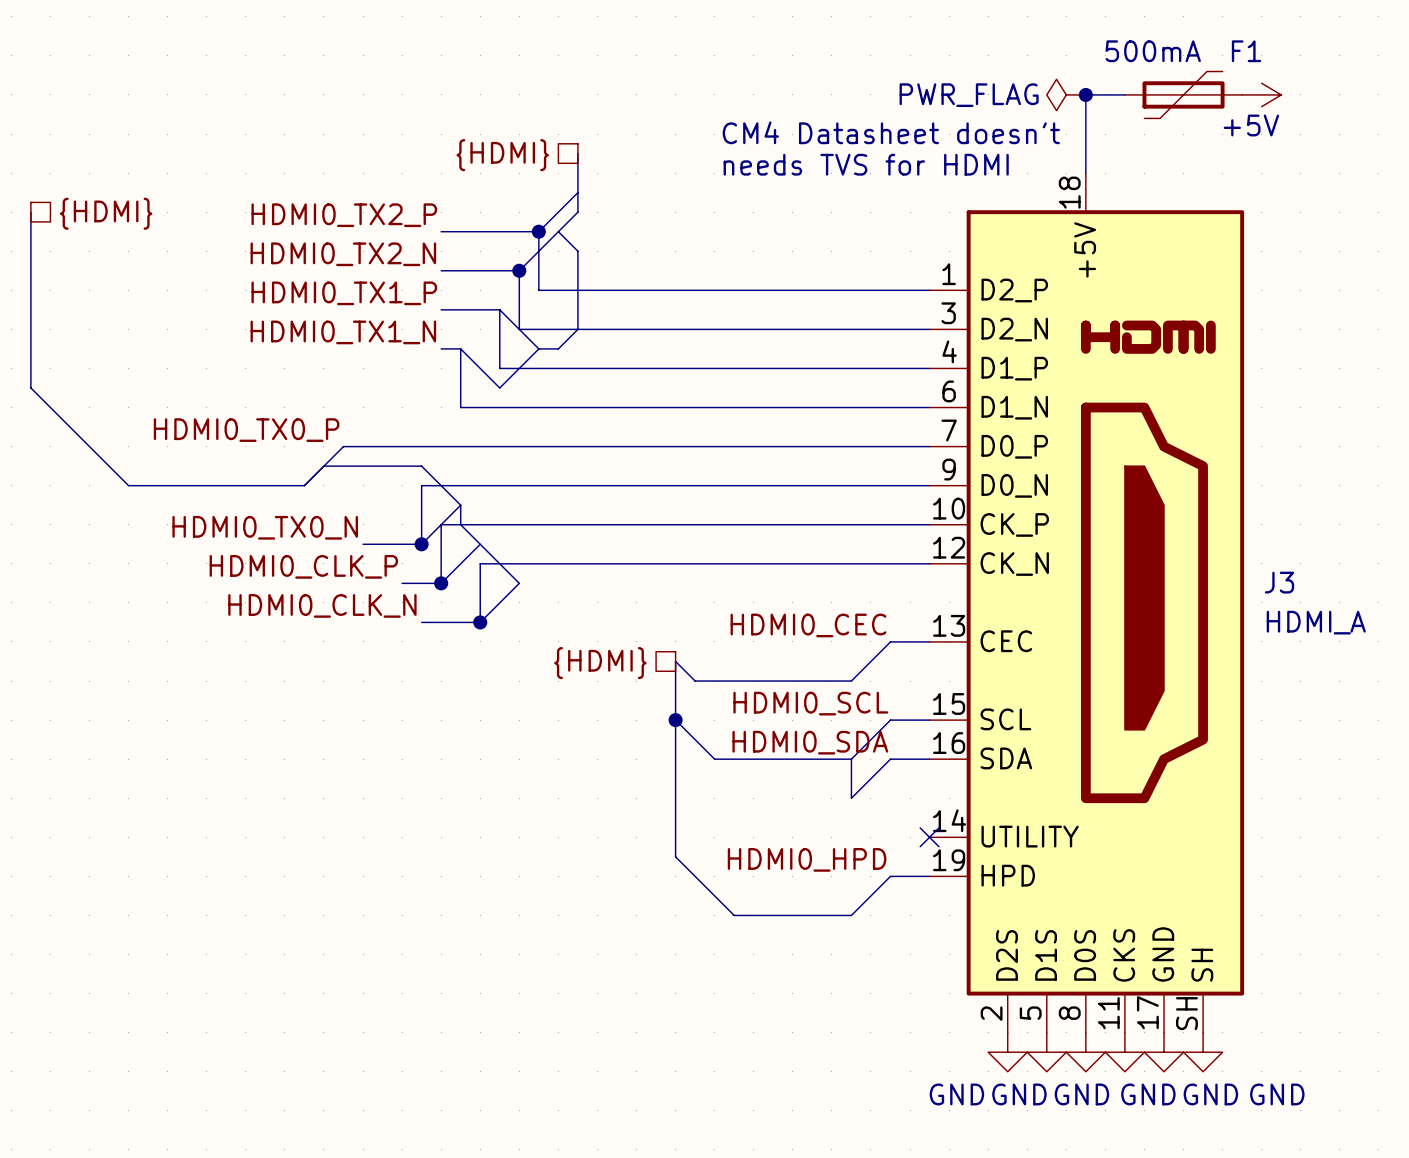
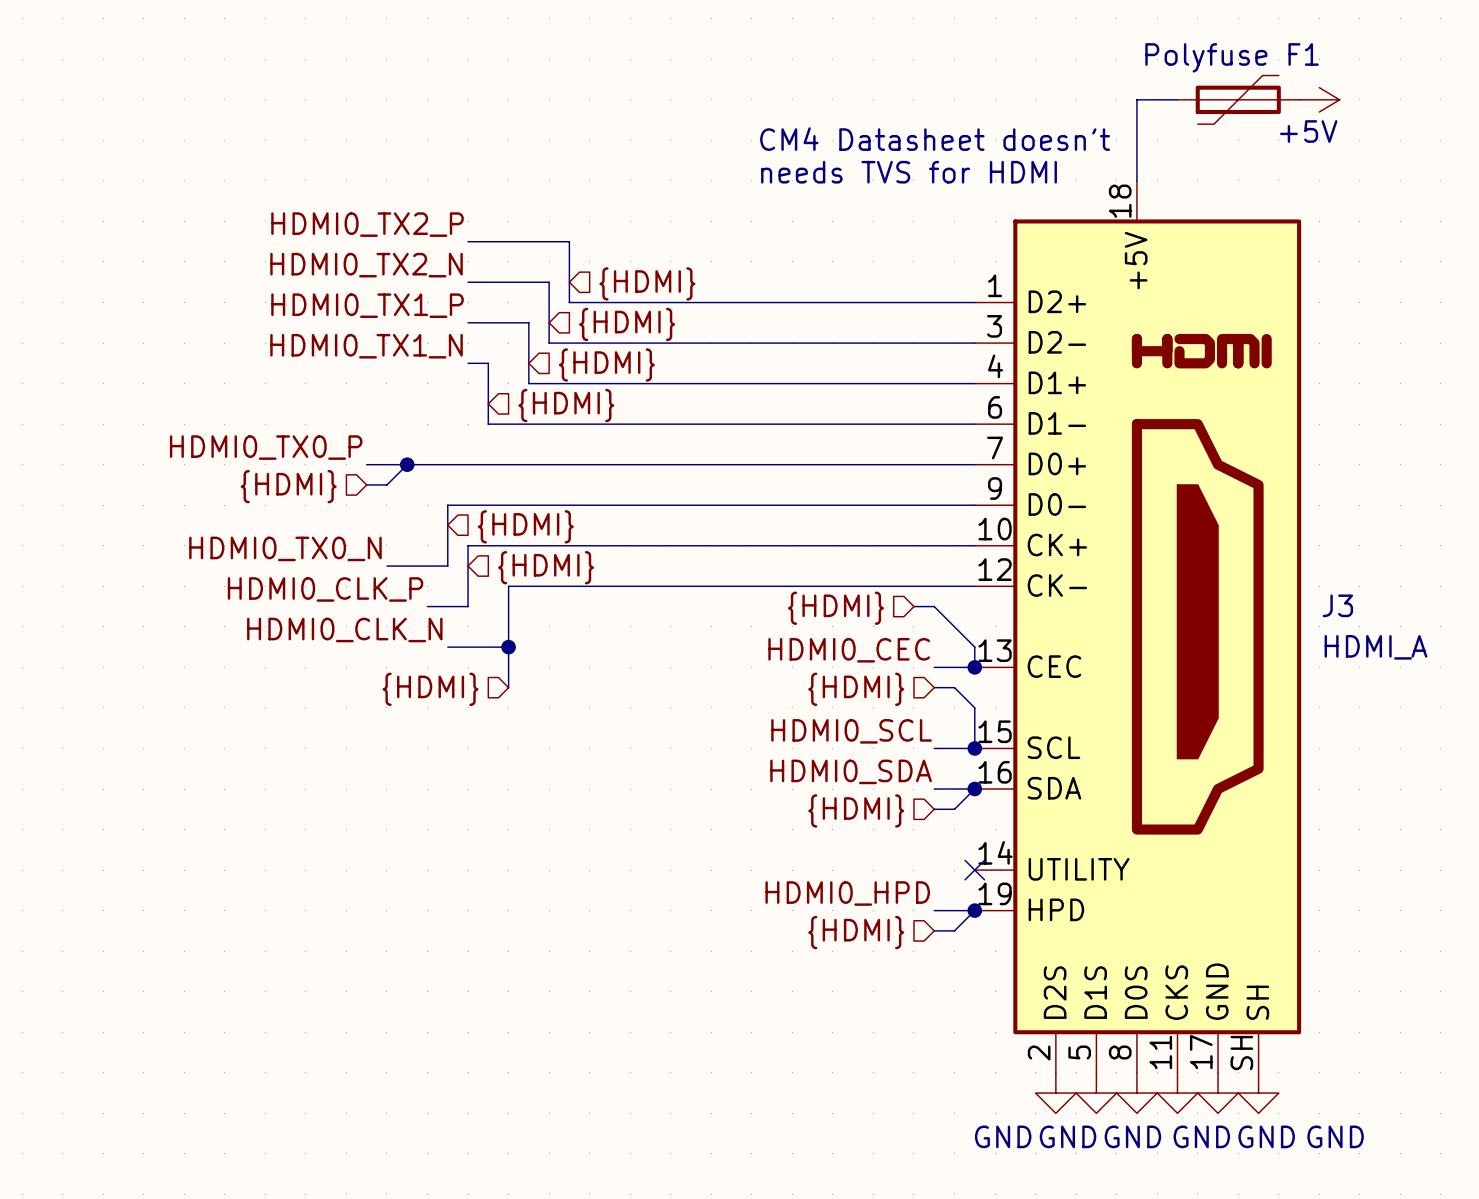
F1 value: 500mA (1153, 51) -> Polyfuse (1206, 57)
power symbol: PWR_FLAG (1066, 94) -> none
junction: (1085, 94) -> none
bus: (577, 153) (577, 212) (558, 231) (577, 251) (577, 329) (558, 348) (538, 348) (499, 387) -> none
hierarchical label: {HDMI} (502, 155) -> none
wire: (577, 192) (538, 231) -> none
bus: (30, 212) (30, 387) (128, 485) (304, 485) (323, 466) (421, 466) (460, 505) (460, 524) (519, 583) -> none
hierarchical label: {HDMI} (106, 213) -> none
junction: (538, 231) -> none
wire: (558, 231) (519, 270) -> none
junction: (519, 270) -> none
hierarchical label: none -> {HDMI} (647, 283)
J3 pin name: D2_P (1014, 290) -> D2+ (1057, 301)
wire: (499, 309) (538, 348) -> none
hierarchical label: none -> {HDMI} (627, 324)
J3 pin name: D2_N (1014, 329) -> D2- (1057, 342)
wire: (460, 348) (499, 387) -> none
hierarchical label: none -> {HDMI} (606, 365)
J3 pin name: D1_P (1014, 368) -> D1+ (1057, 382)
hierarchical label: none -> {HDMI} (566, 405)
J3 pin name: D1_N (1014, 407) -> D1- (1057, 423)
wire: (343, 446) (304, 485) -> none
wire: none -> (407, 464) (386, 484) (366, 484)
junction: none -> (407, 464)
J3 pin name: D0_P (1014, 446) -> D0+ (1057, 463)
hierarchical label: none -> {HDMI} (288, 486)
J3 pin name: D0_N (1014, 485) -> D0- (1057, 504)
wire: (460, 505) (421, 544) -> none
hierarchical label: none -> {HDMI} (525, 526)
J3 pin name: CK_P (1014, 524) -> CK+ (1057, 545)
junction: (421, 544) -> none
wire: (480, 544) (441, 583) -> none
hierarchical label: none -> {HDMI} (546, 567)
J3 pin name: CK_N (1014, 564) -> CK- (1057, 585)
junction: (441, 583) -> none
wire: (519, 583) (480, 622) -> (508, 687) (508, 647)
wire: none -> (913, 606) (934, 606) (974, 647) (974, 667)
hierarchical label: none -> {HDMI} (835, 608)
wire: (890, 641) (851, 681) -> none
junction: none -> (974, 667)
wire: none -> (934, 687) (954, 687) (974, 707) (974, 748)
hierarchical label: none -> {HDMI} (430, 689)
hierarchical label: {HDMI} (600, 663) -> none
hierarchical label: none -> {HDMI} (856, 689)
bus: (851, 681) (695, 681) (675, 661) (675, 856) (734, 915) (851, 915) -> none
bus: (675, 720) (714, 759) (851, 759) (851, 798) -> none
junction: (675, 720) -> none
wire: (890, 720) (851, 759) -> none
junction: none -> (974, 748)
wire: (890, 759) (851, 798) -> none
wire: none -> (974, 789) (954, 809) (934, 809)
junction: none -> (974, 789)
hierarchical label: none -> {HDMI} (856, 810)
wire: (890, 876) (851, 915) -> none
wire: none -> (974, 910) (954, 930) (934, 930)
junction: none -> (974, 910)
hierarchical label: none -> {HDMI} (856, 932)

